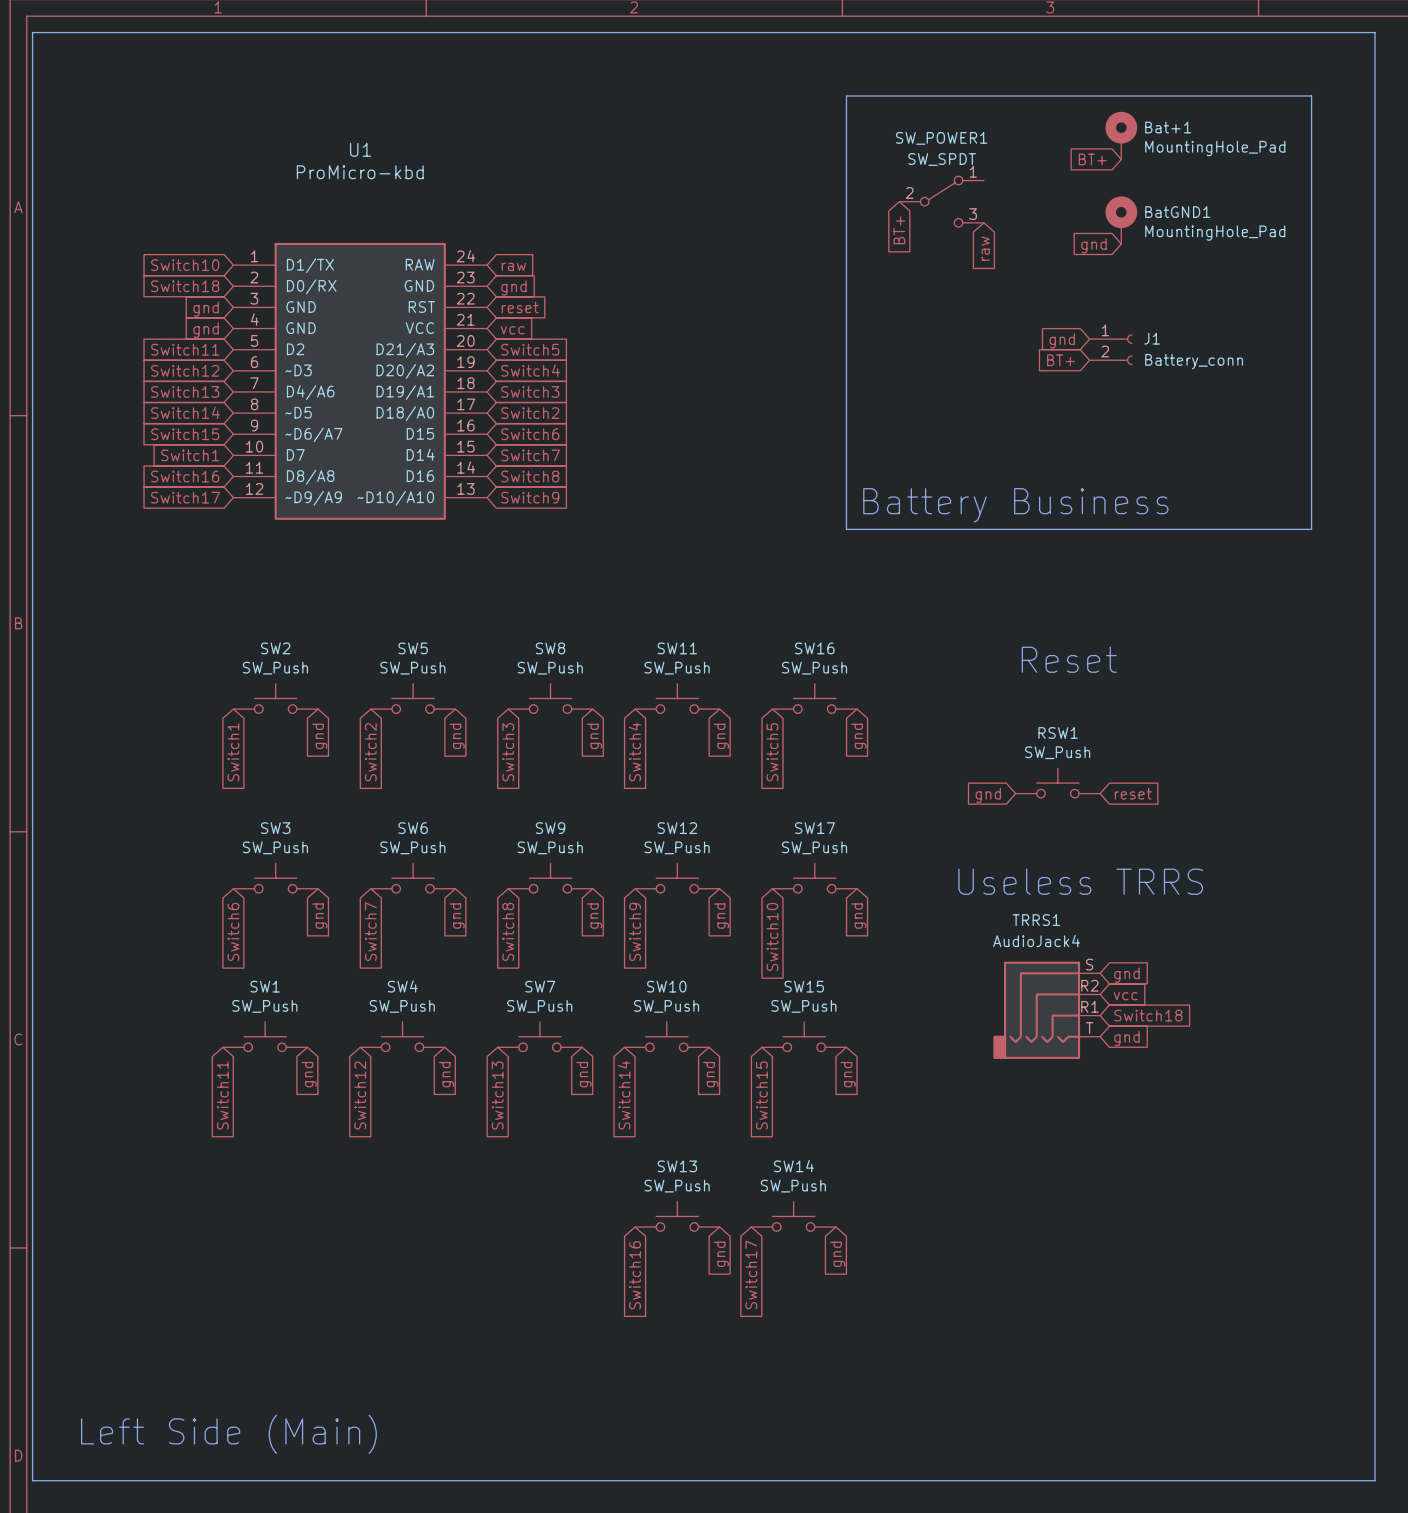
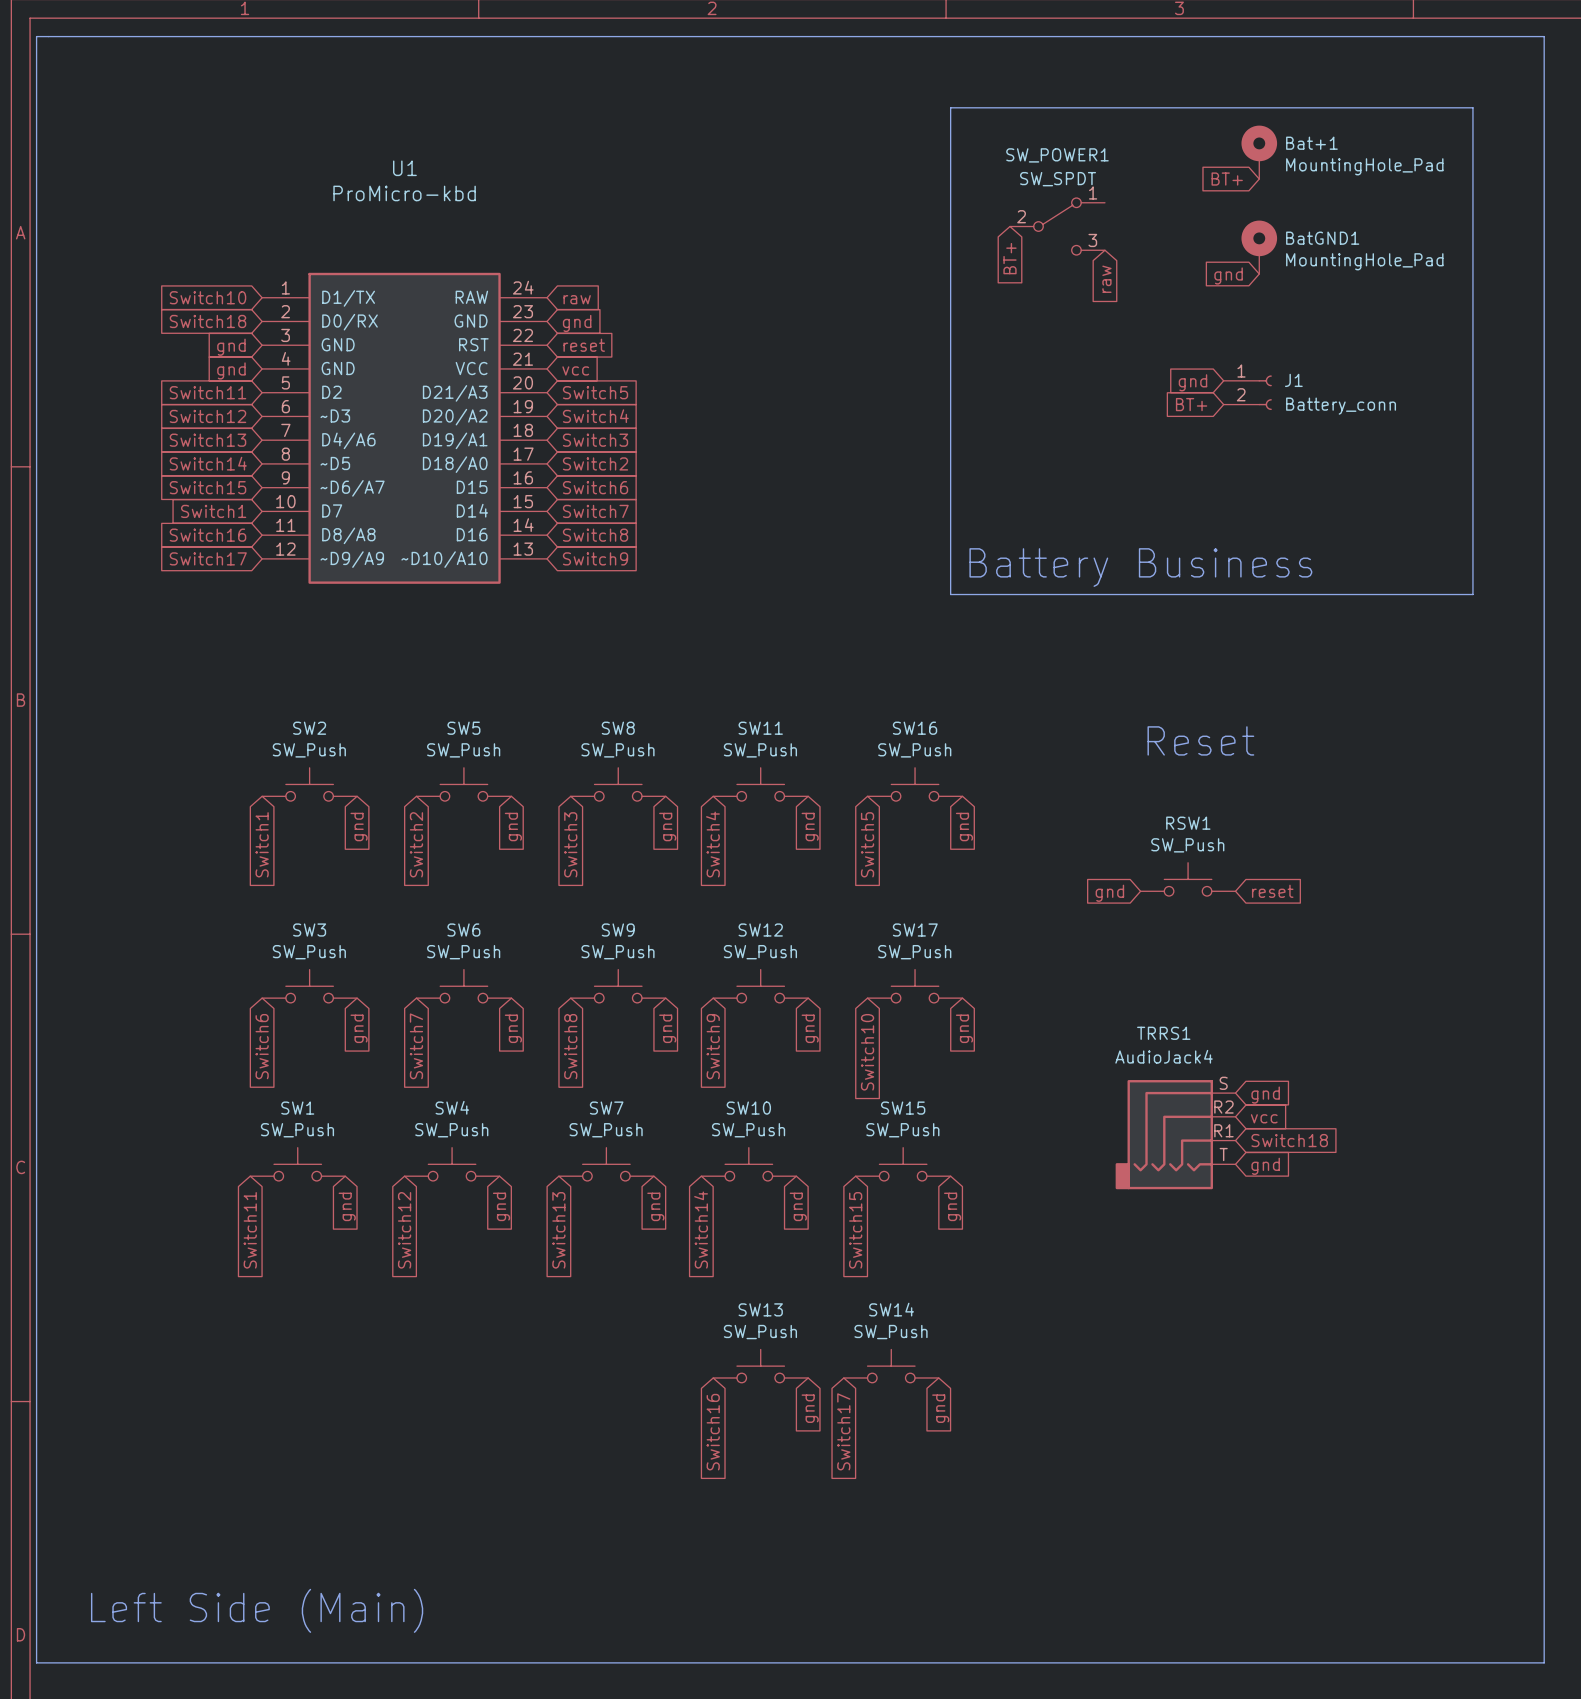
text: Useless TRRS (1080, 881) -> none

